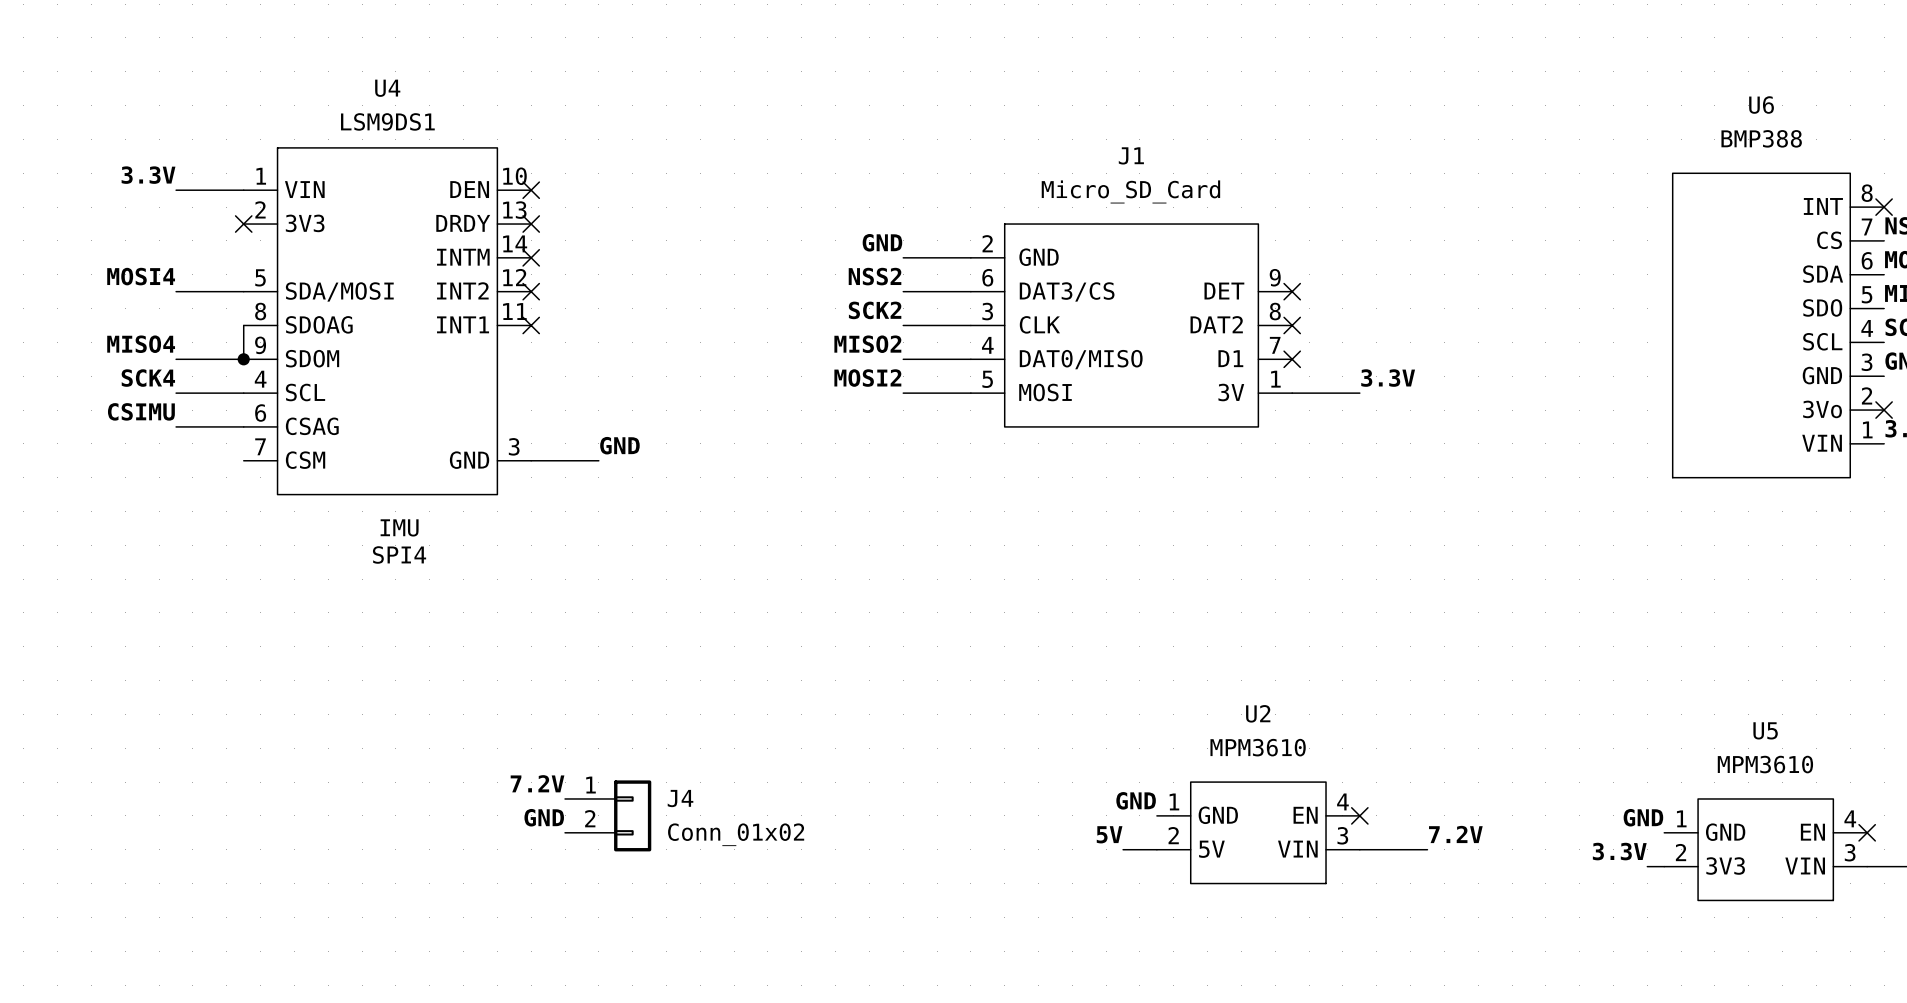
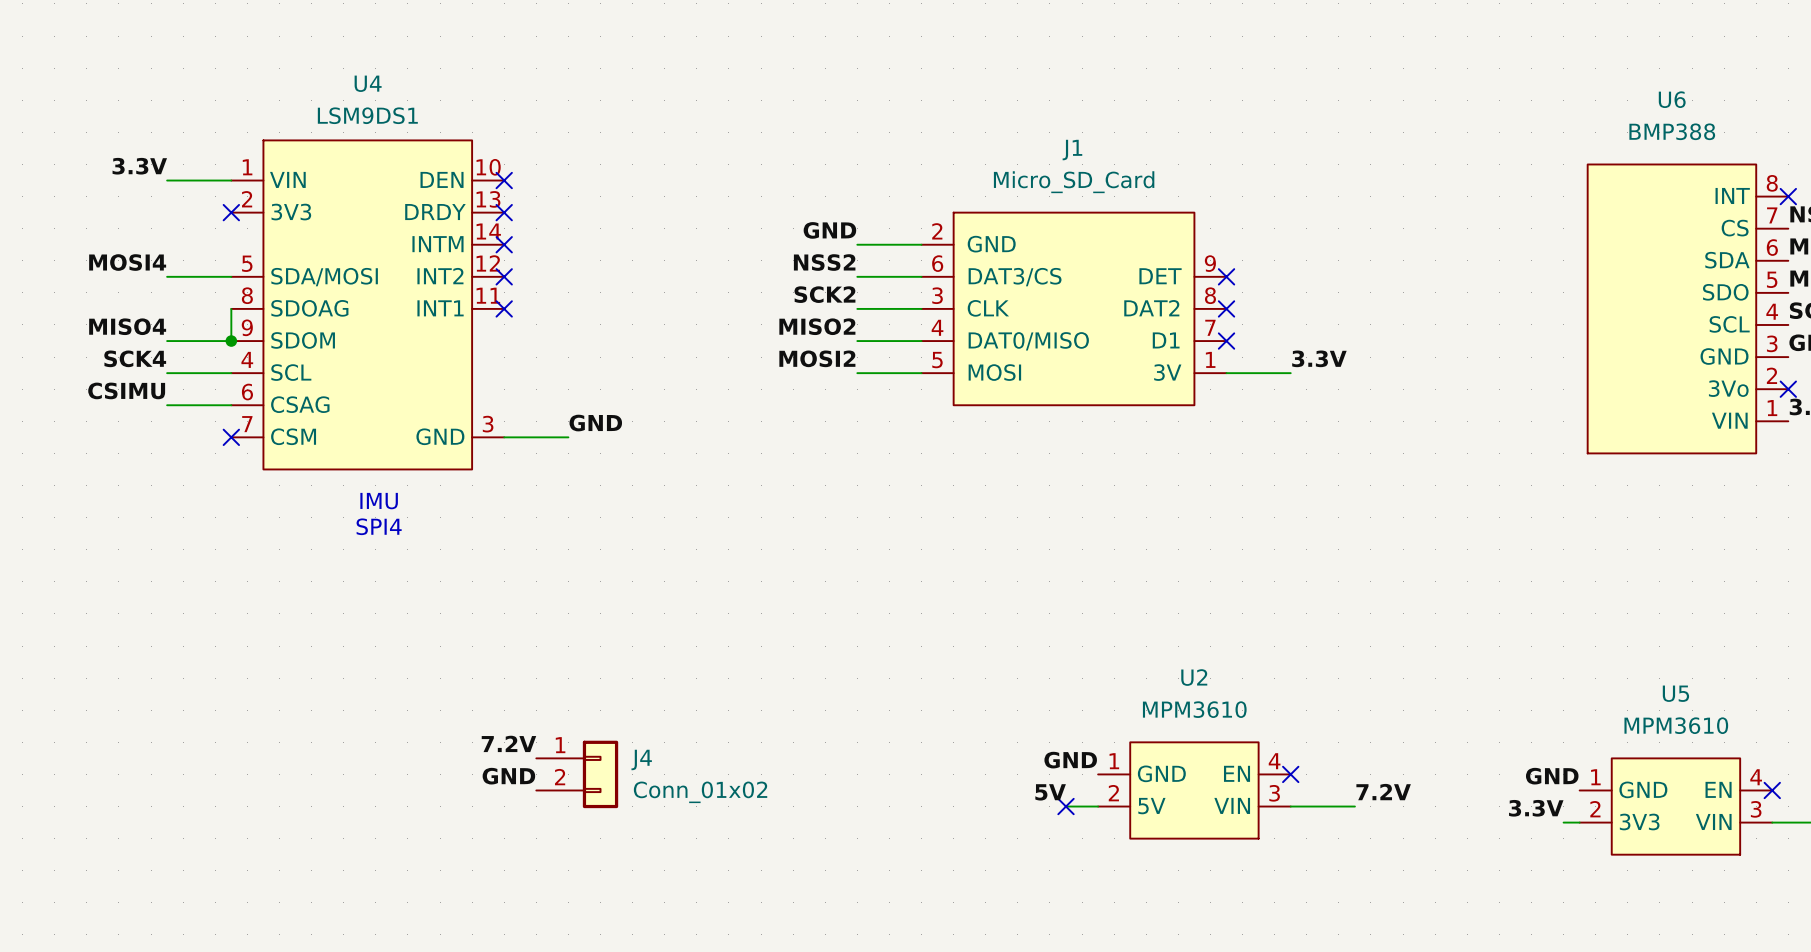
no-connect mark: none -> (231, 437)
no-connect mark: none -> (1066, 806)

